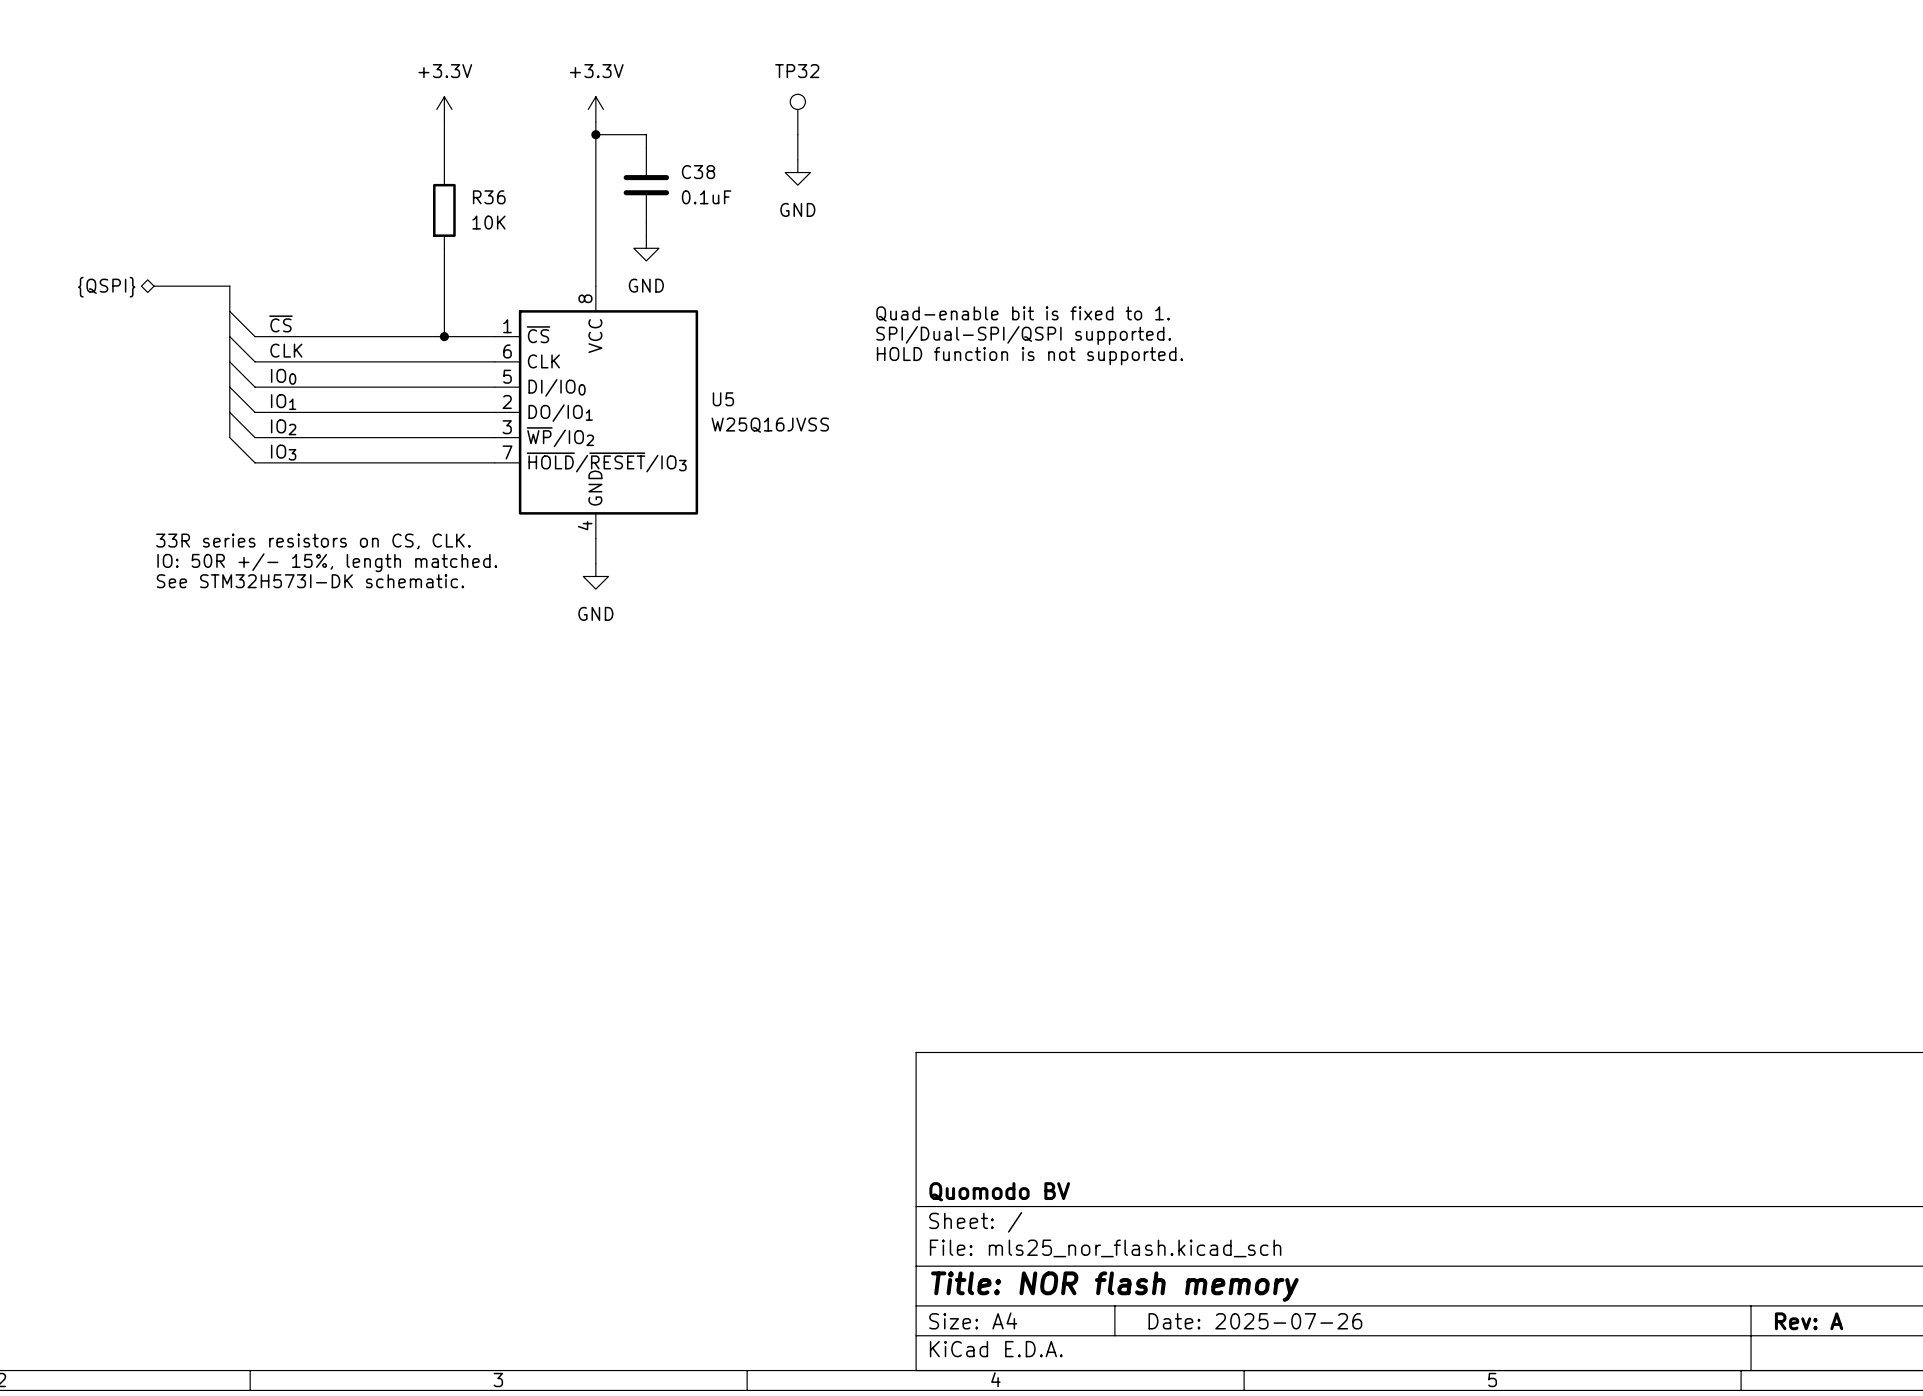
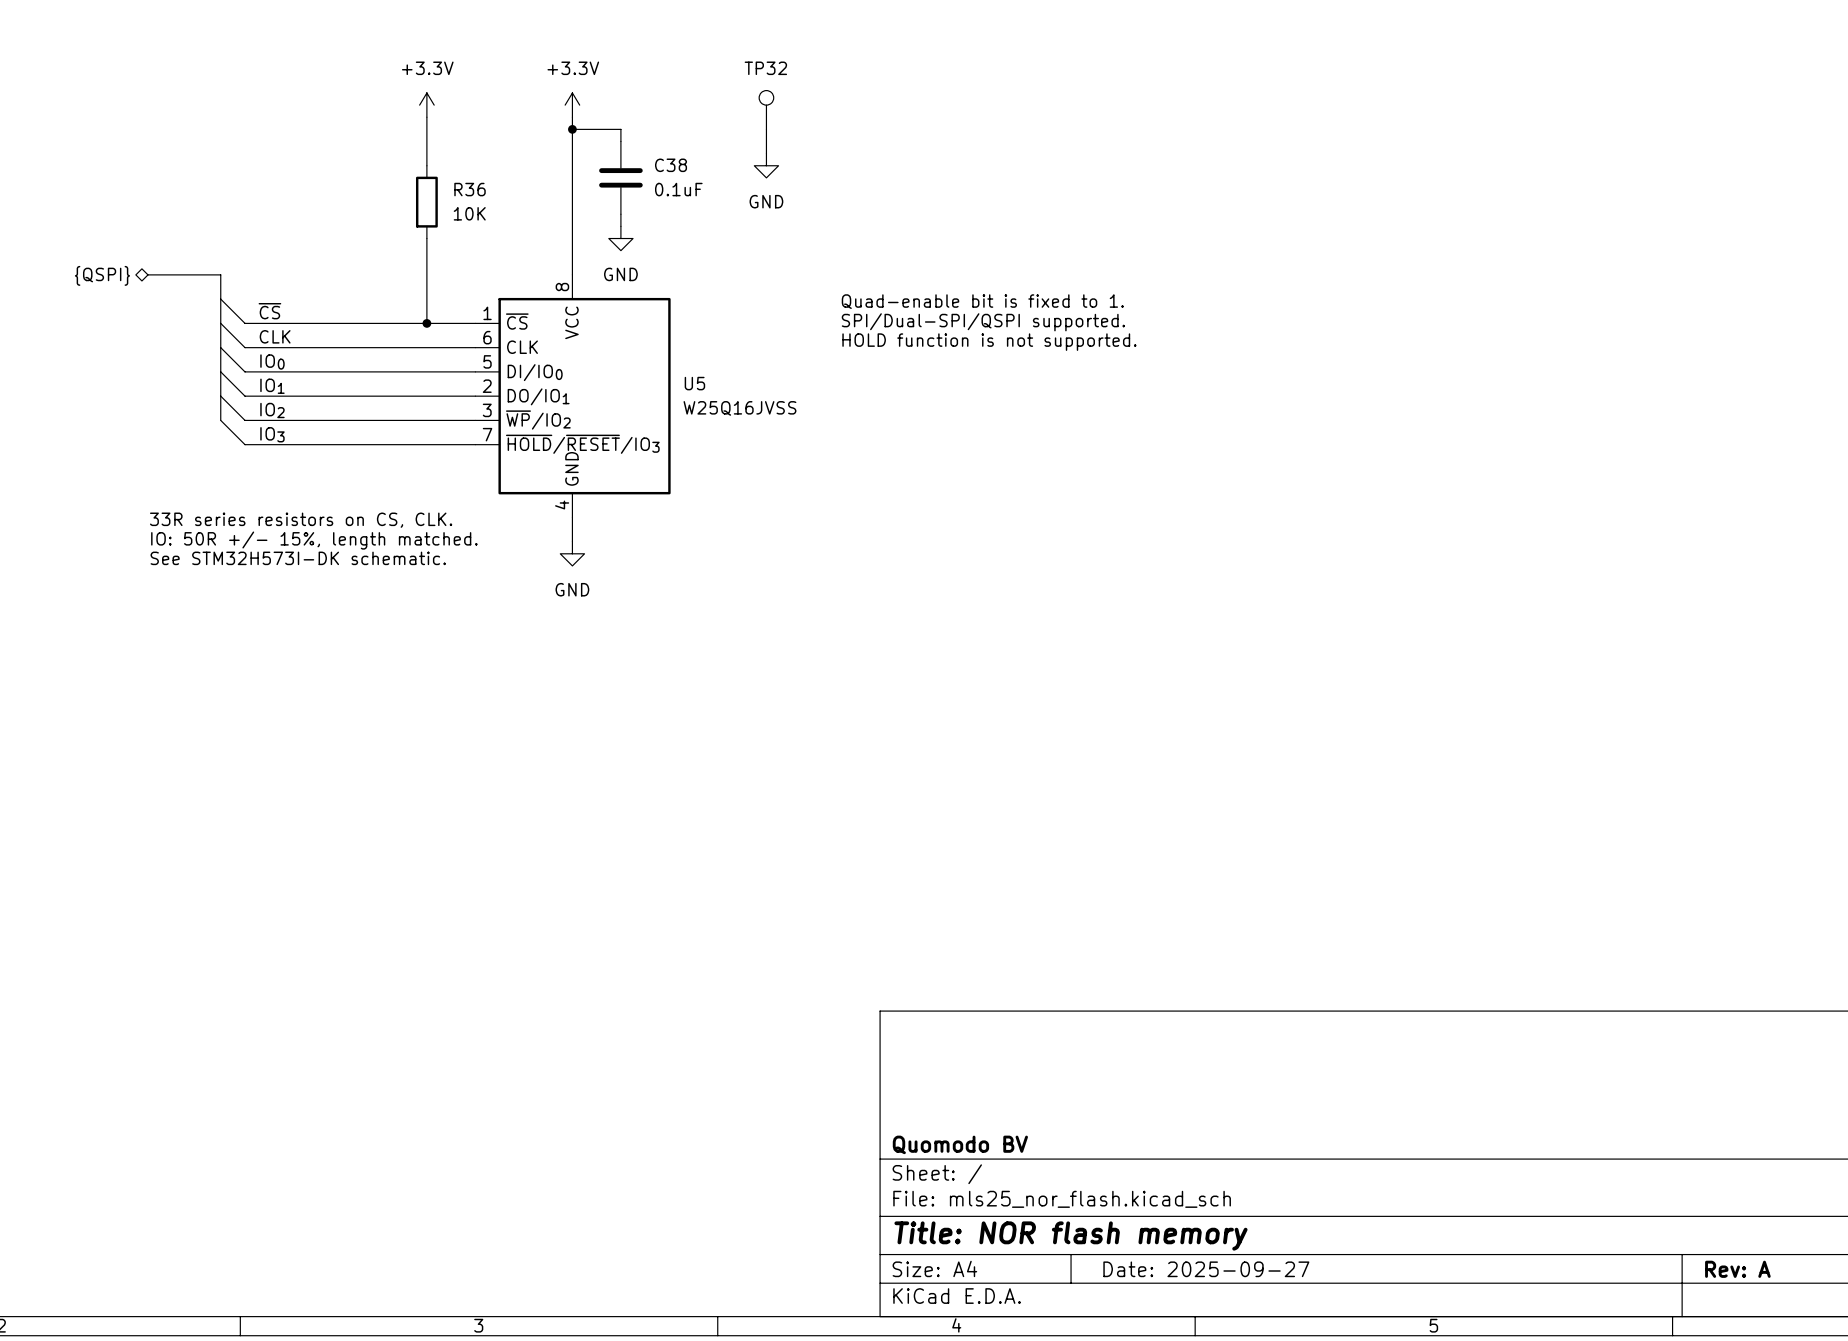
title block: Date: 2025-07-26 (1255, 1321) -> Date: 2025-09-27 (1206, 1269)

